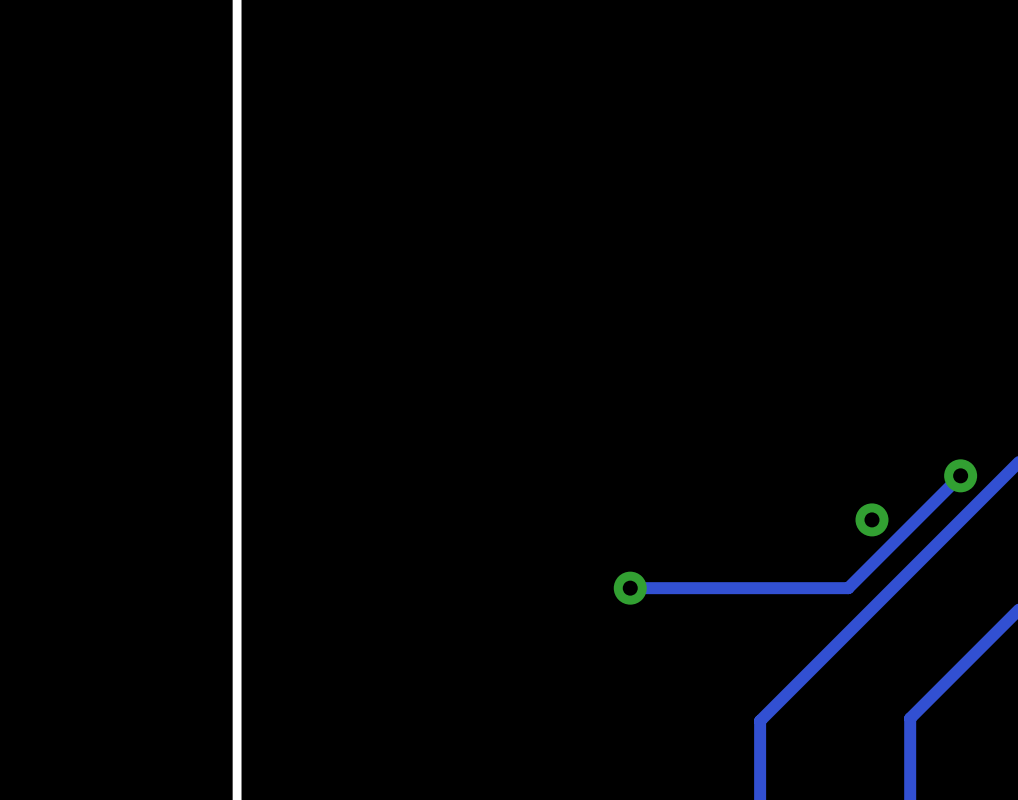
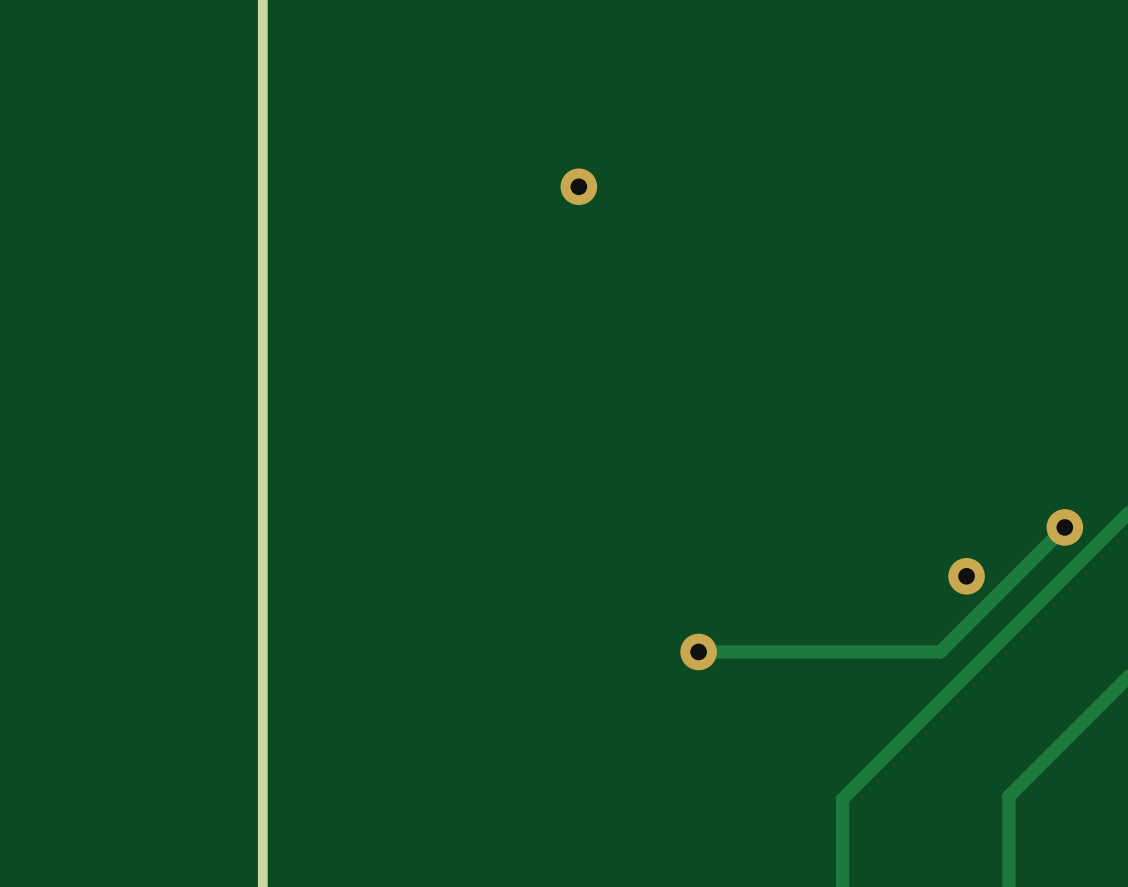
via: none -> (578, 186)

